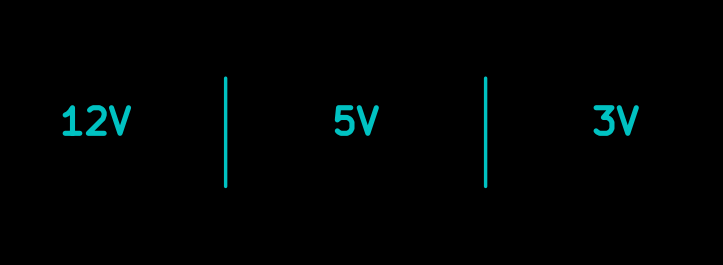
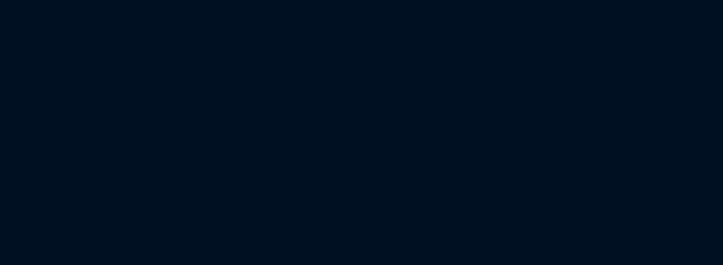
line: (225, 78) (225, 186) -> none
line: (485, 78) (485, 186) -> none
text: 12V (96, 120) -> none
text: 5V (356, 120) -> none
text: 3V (616, 120) -> none

